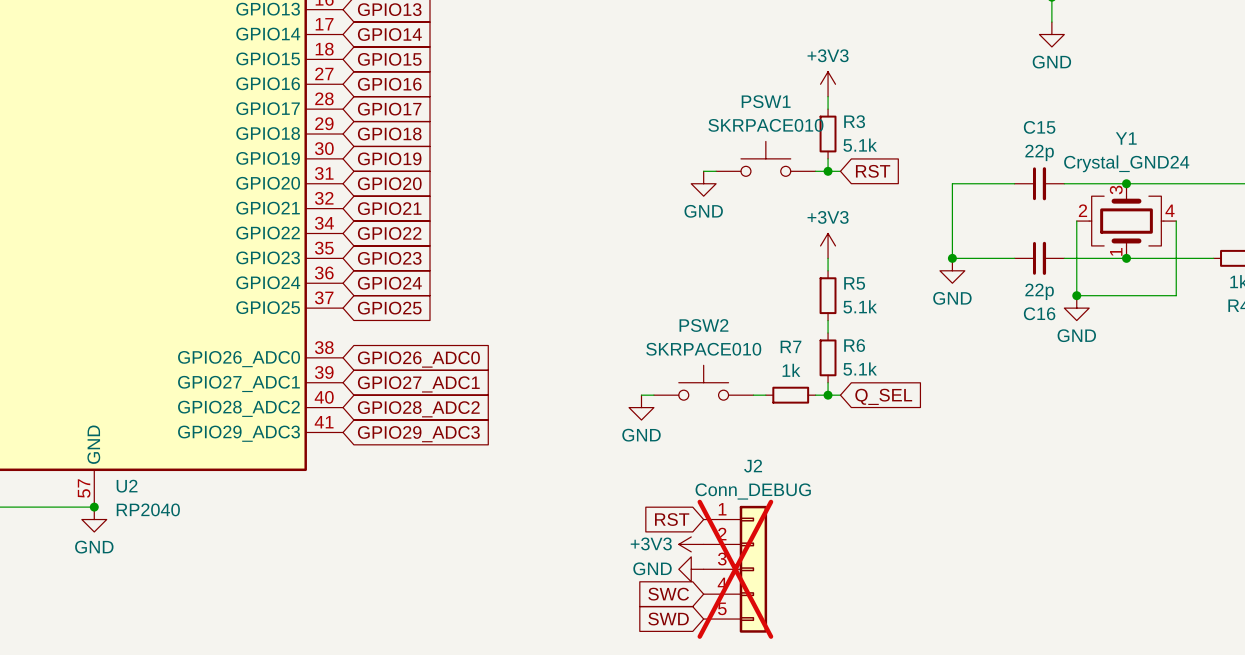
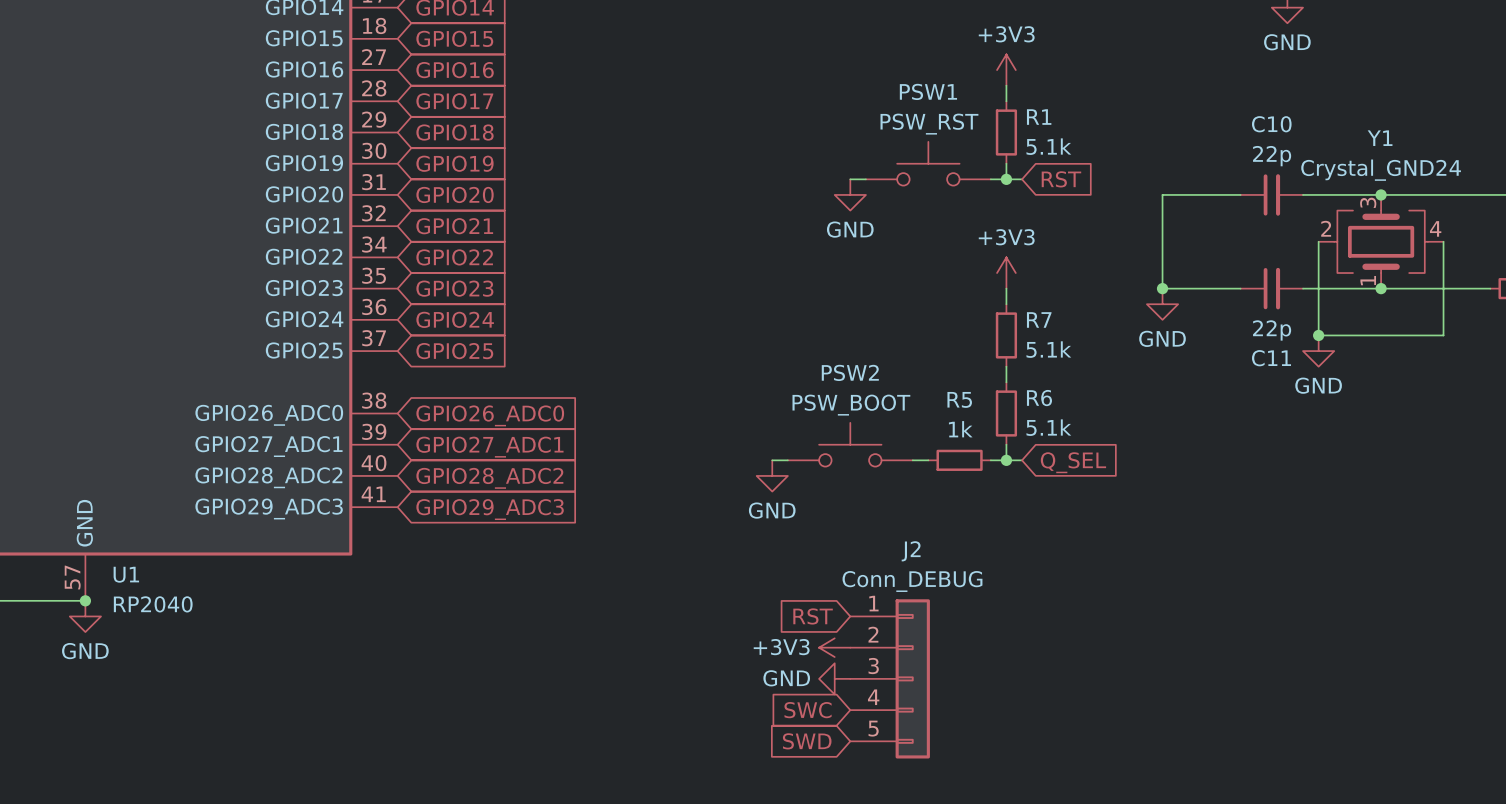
R3 name: R3 (854, 121) -> R1 (1039, 117)
PSW1 value: SKRPACE010 (765, 125) -> PSW_RST (929, 124)
C15 name: C15 (1039, 127) -> C10 (1271, 124)
R5 name: R5 (854, 283) -> R7 (1039, 319)
C16 name: C16 (1039, 313) -> C11 (1271, 358)
R7 name: R7 (791, 346) -> R5 (959, 399)
PSW2 value: SKRPACE010 (703, 349) -> PSW_BOOT (851, 405)
U2 name: U2 (127, 486) -> U1 (126, 574)
J2 do-not-place cross: (735, 569) -> none

